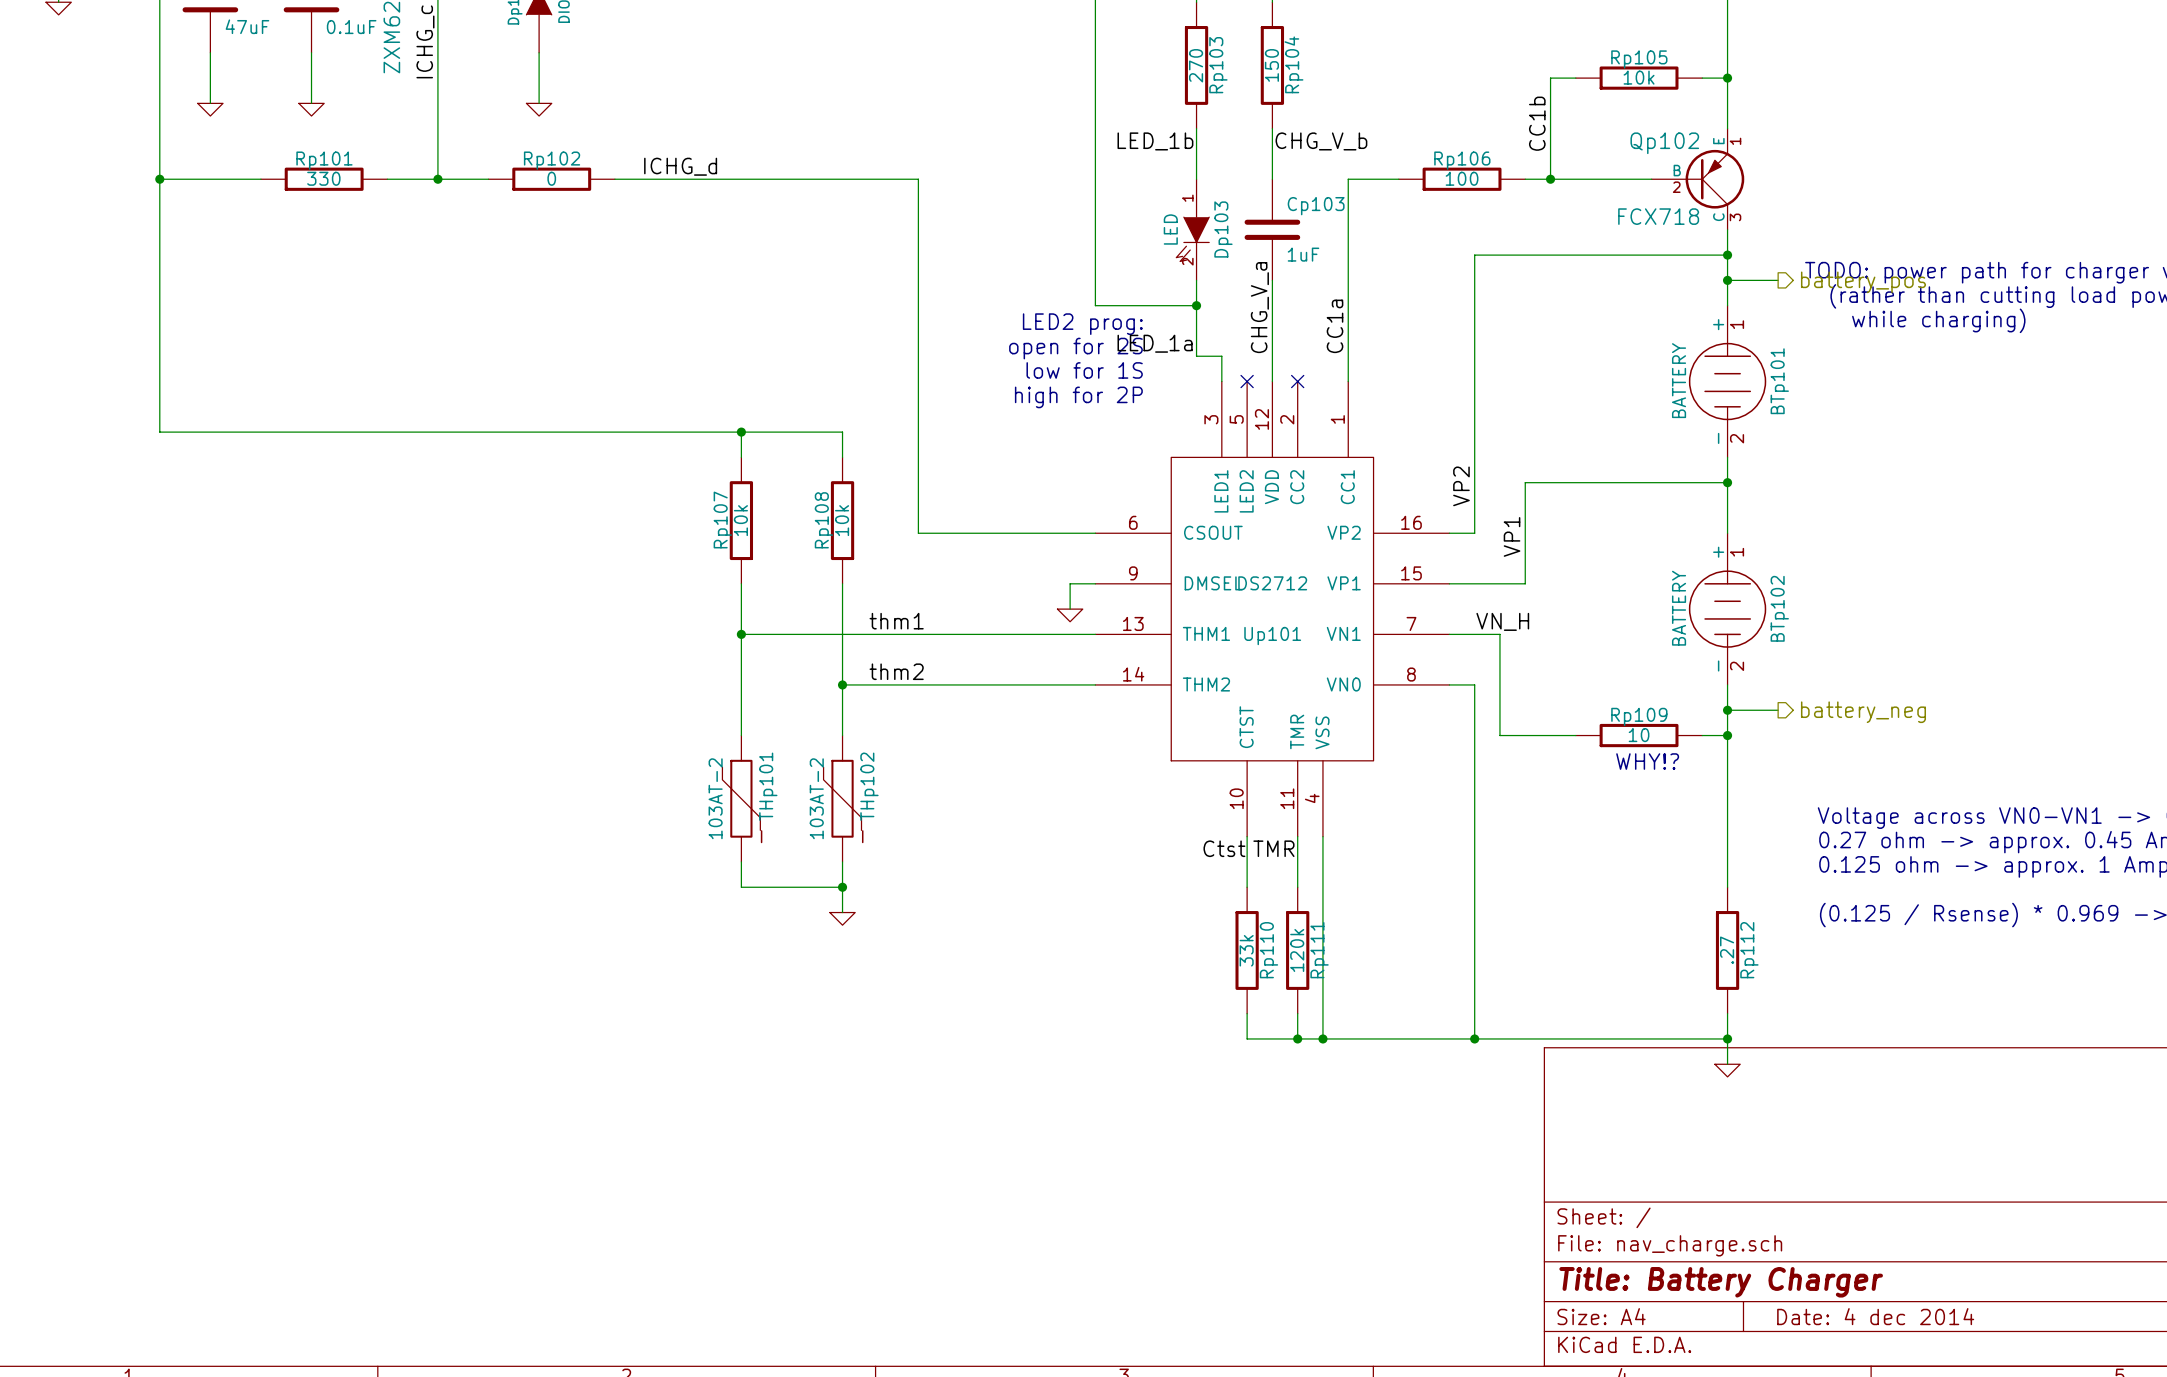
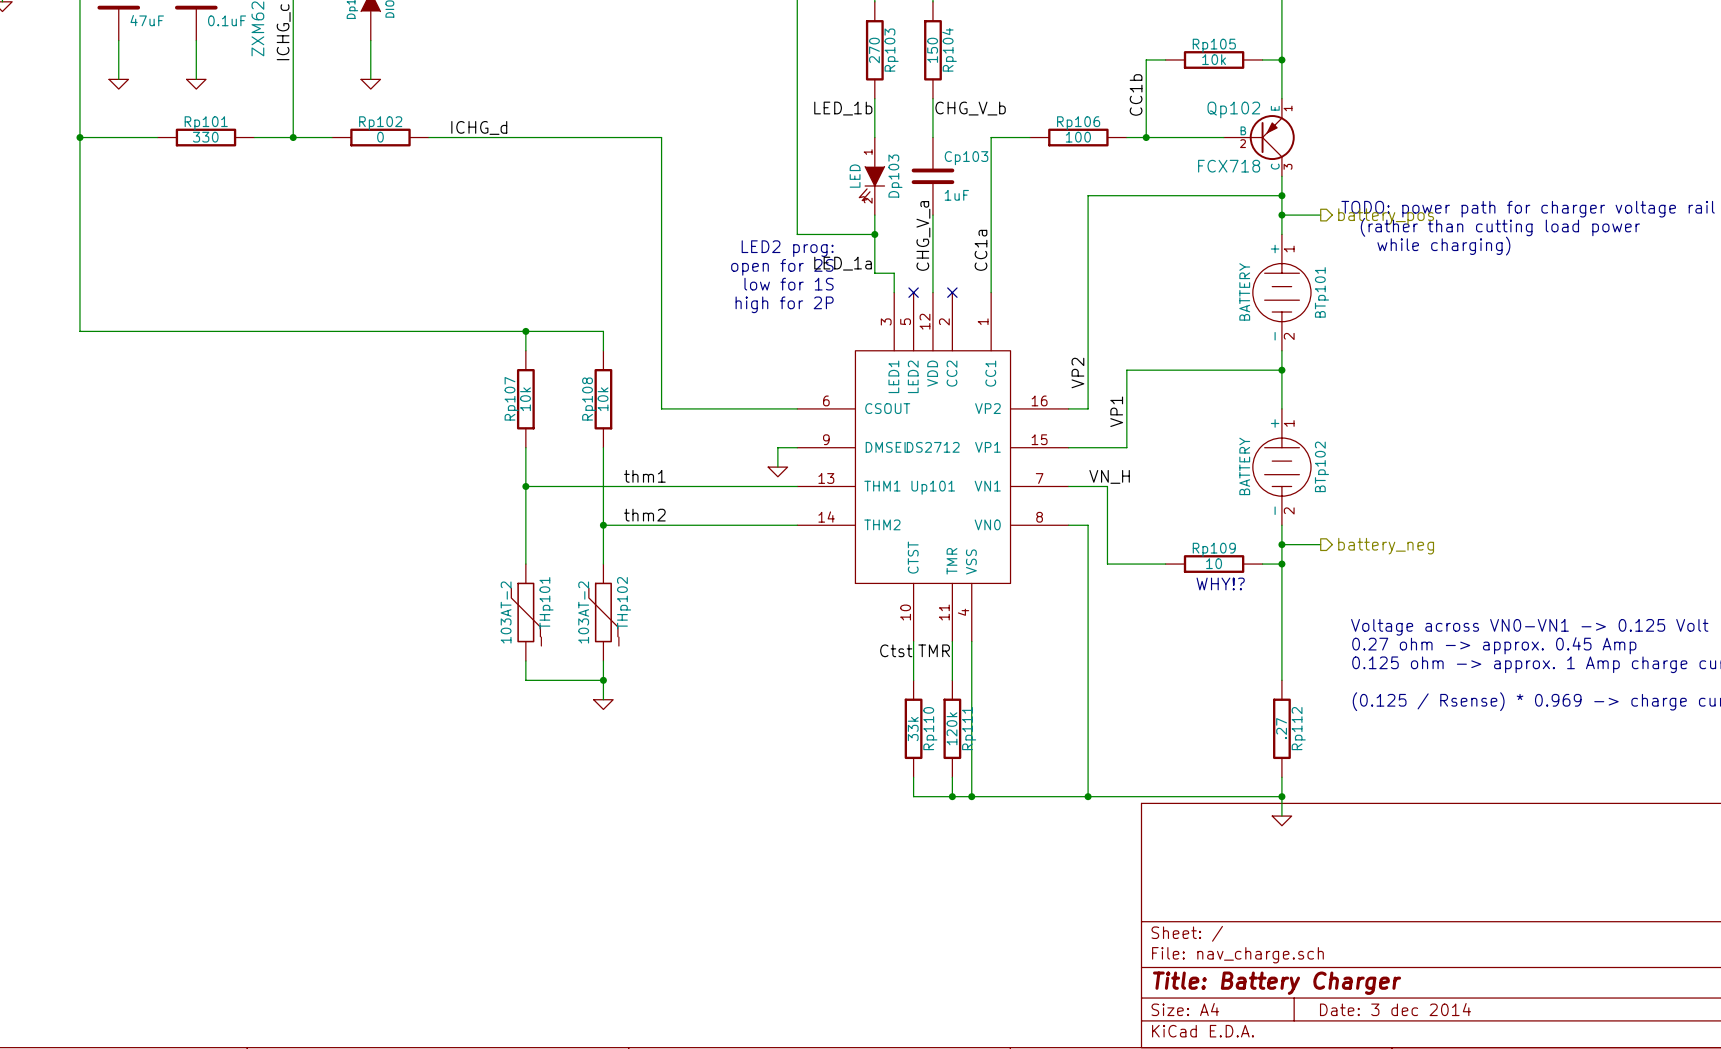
title block: Date: 4 dec 2014 (1875, 1316) -> Date: 3 dec 2014 (1395, 1009)

